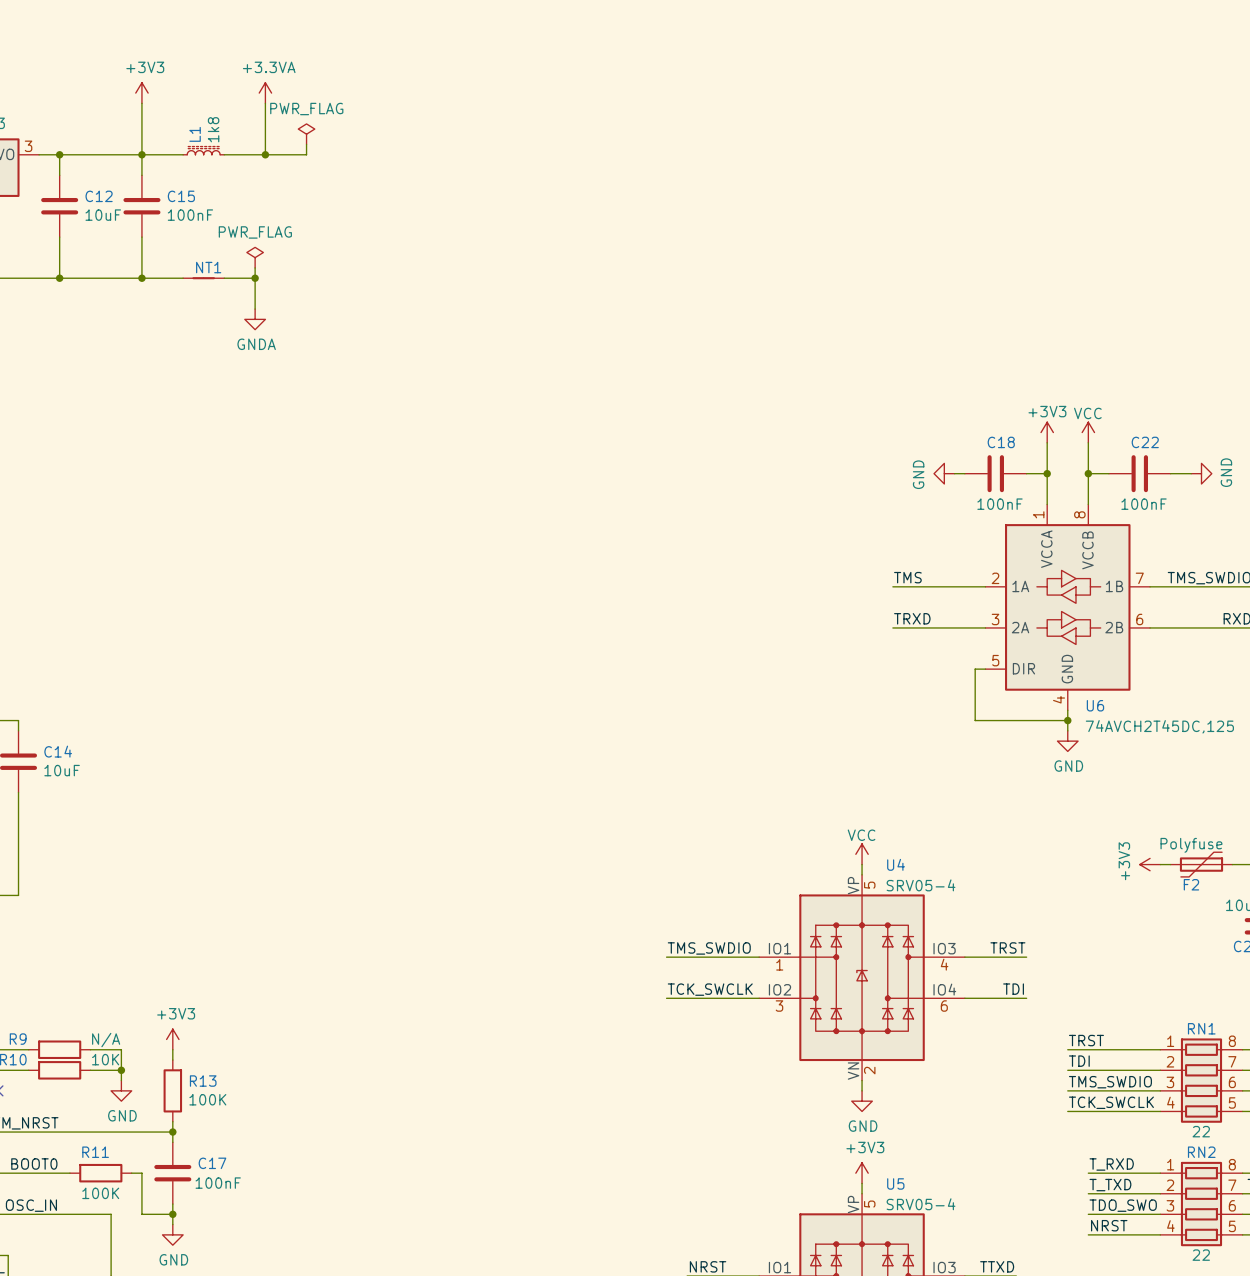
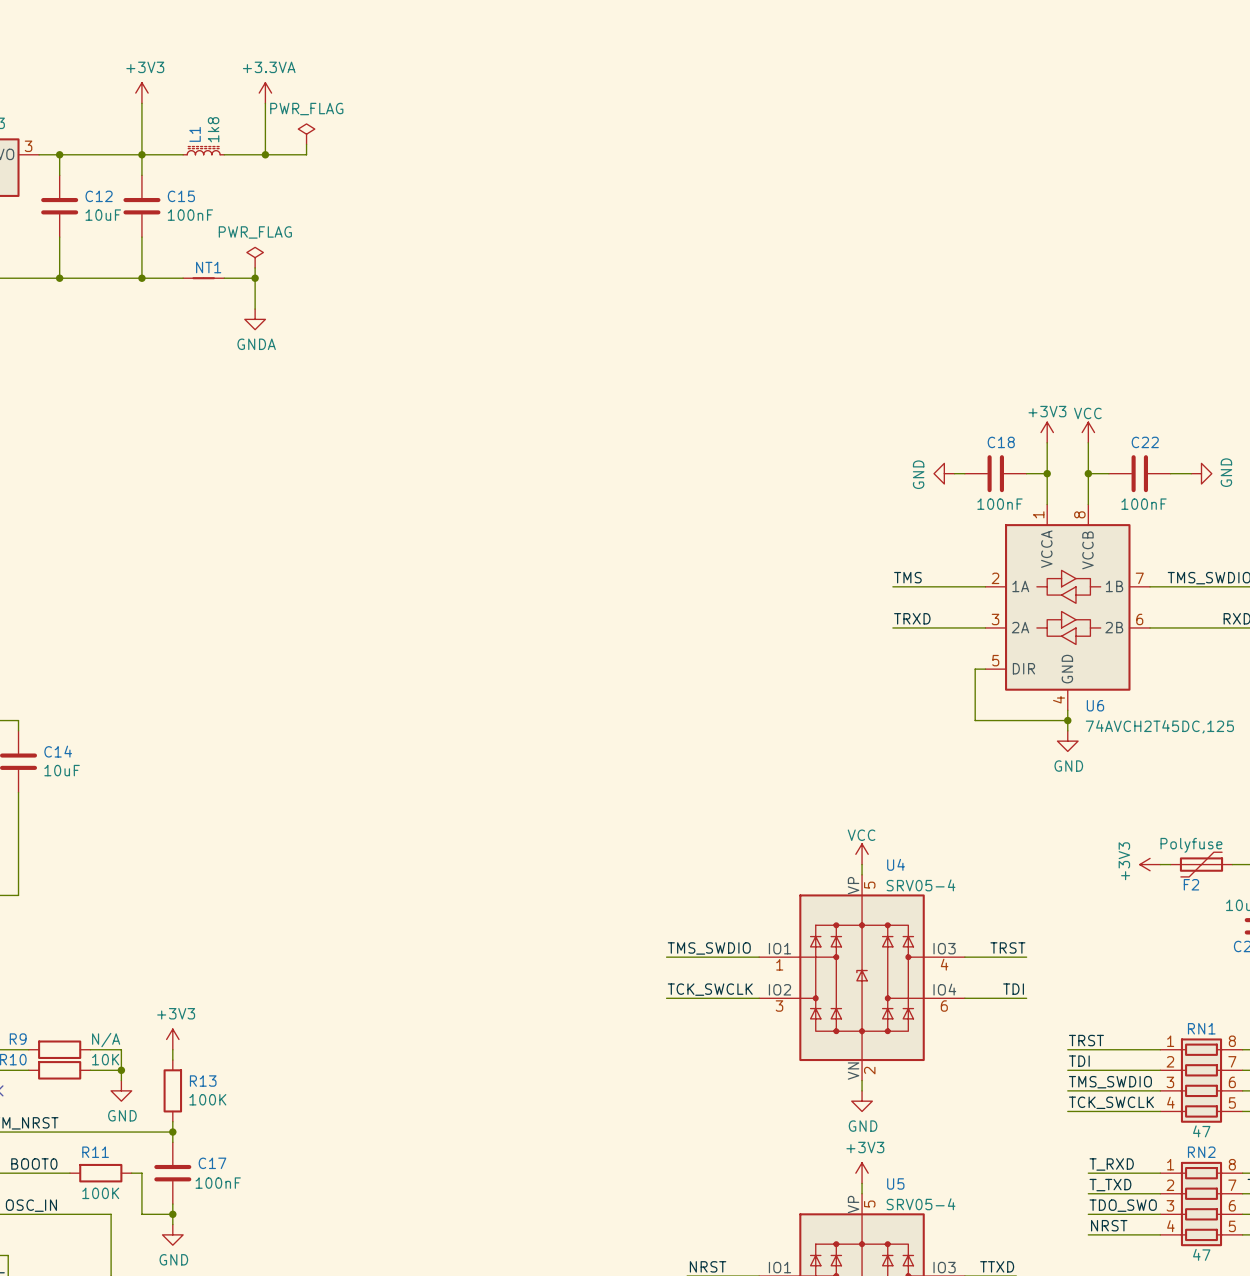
RN1 value: 22 (1201, 1131) -> 47 (1201, 1131)
RN2 value: 22 (1201, 1255) -> 47 (1201, 1254)

